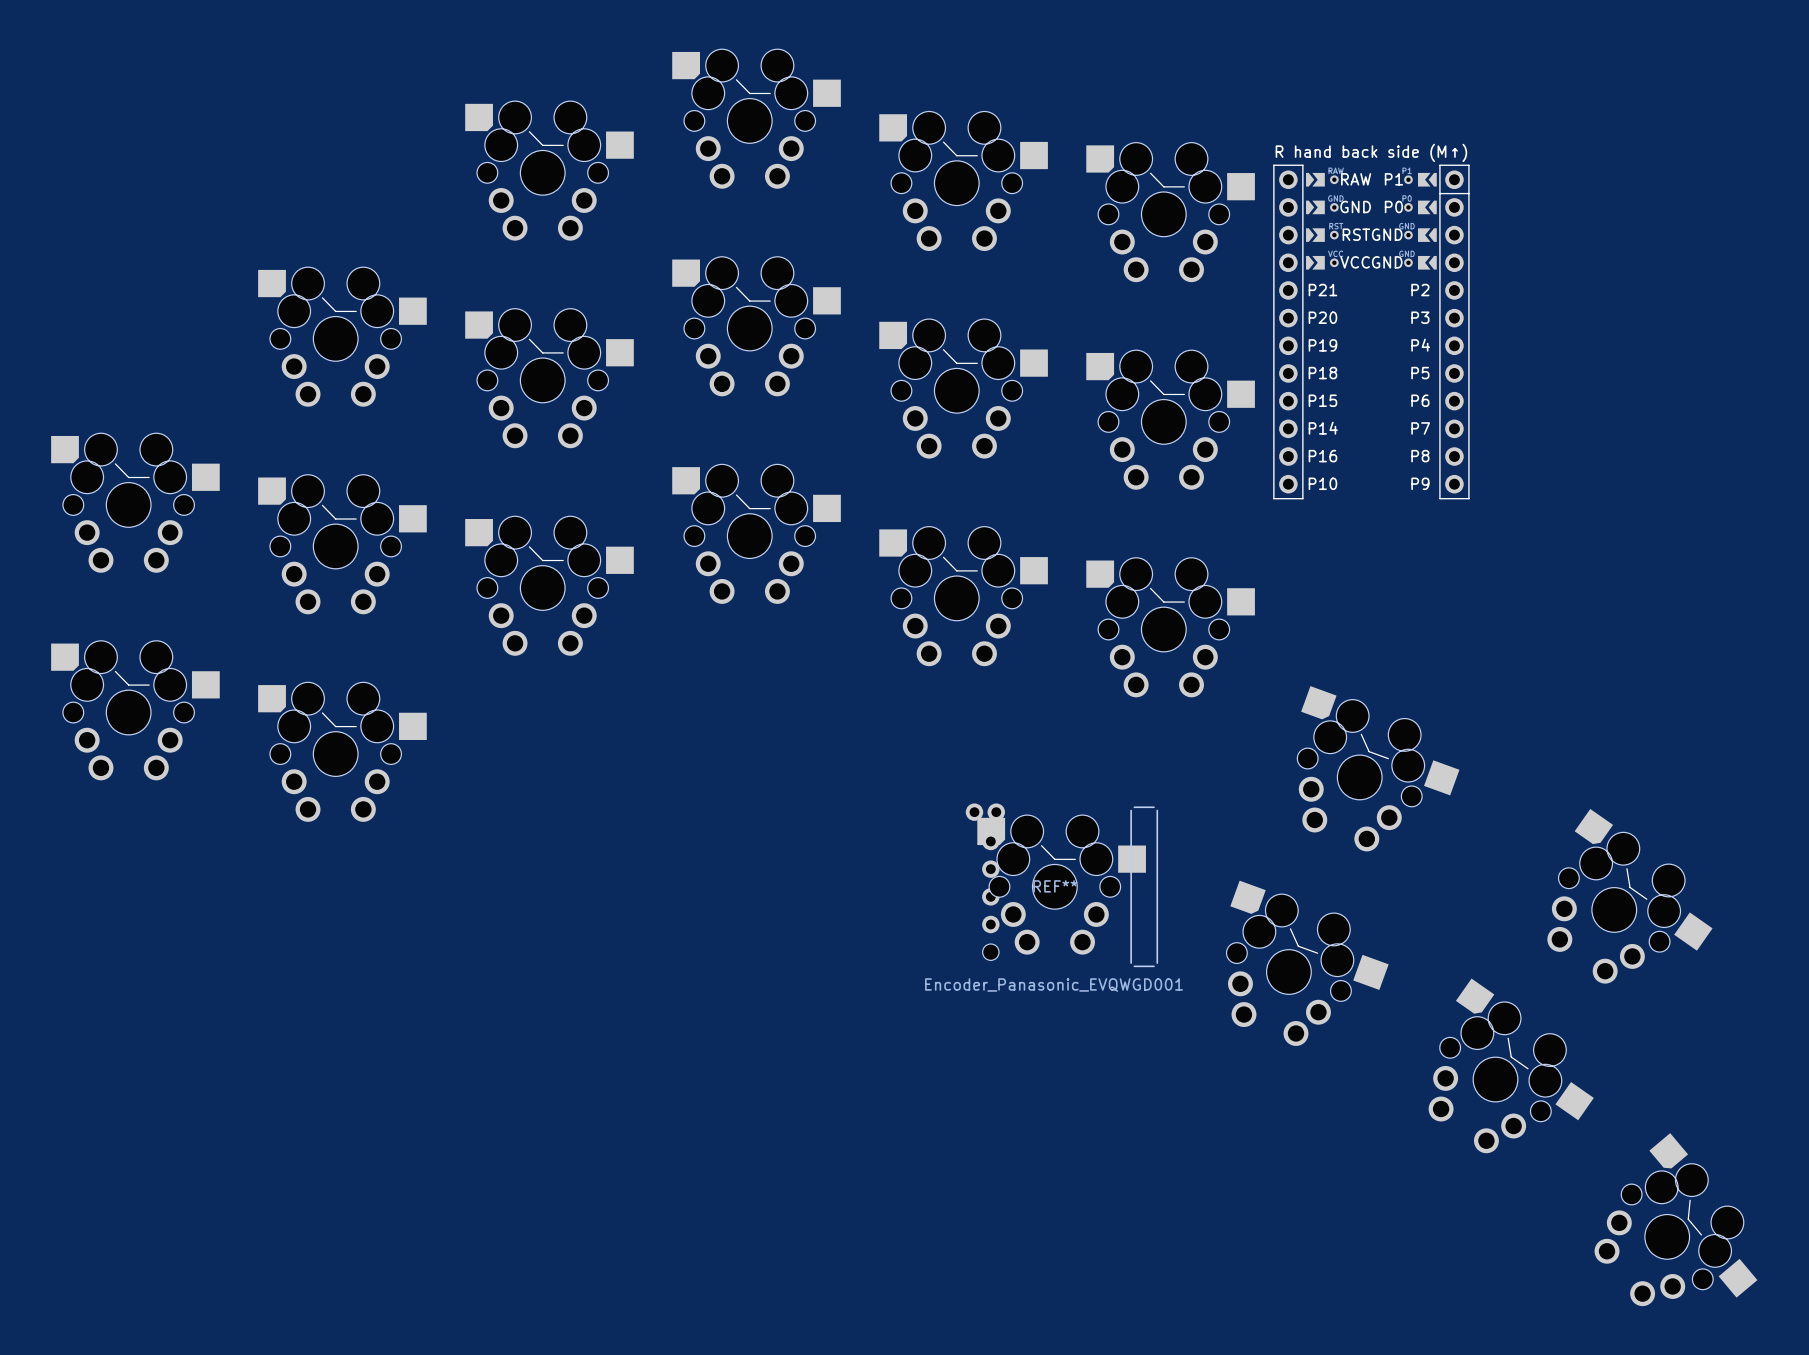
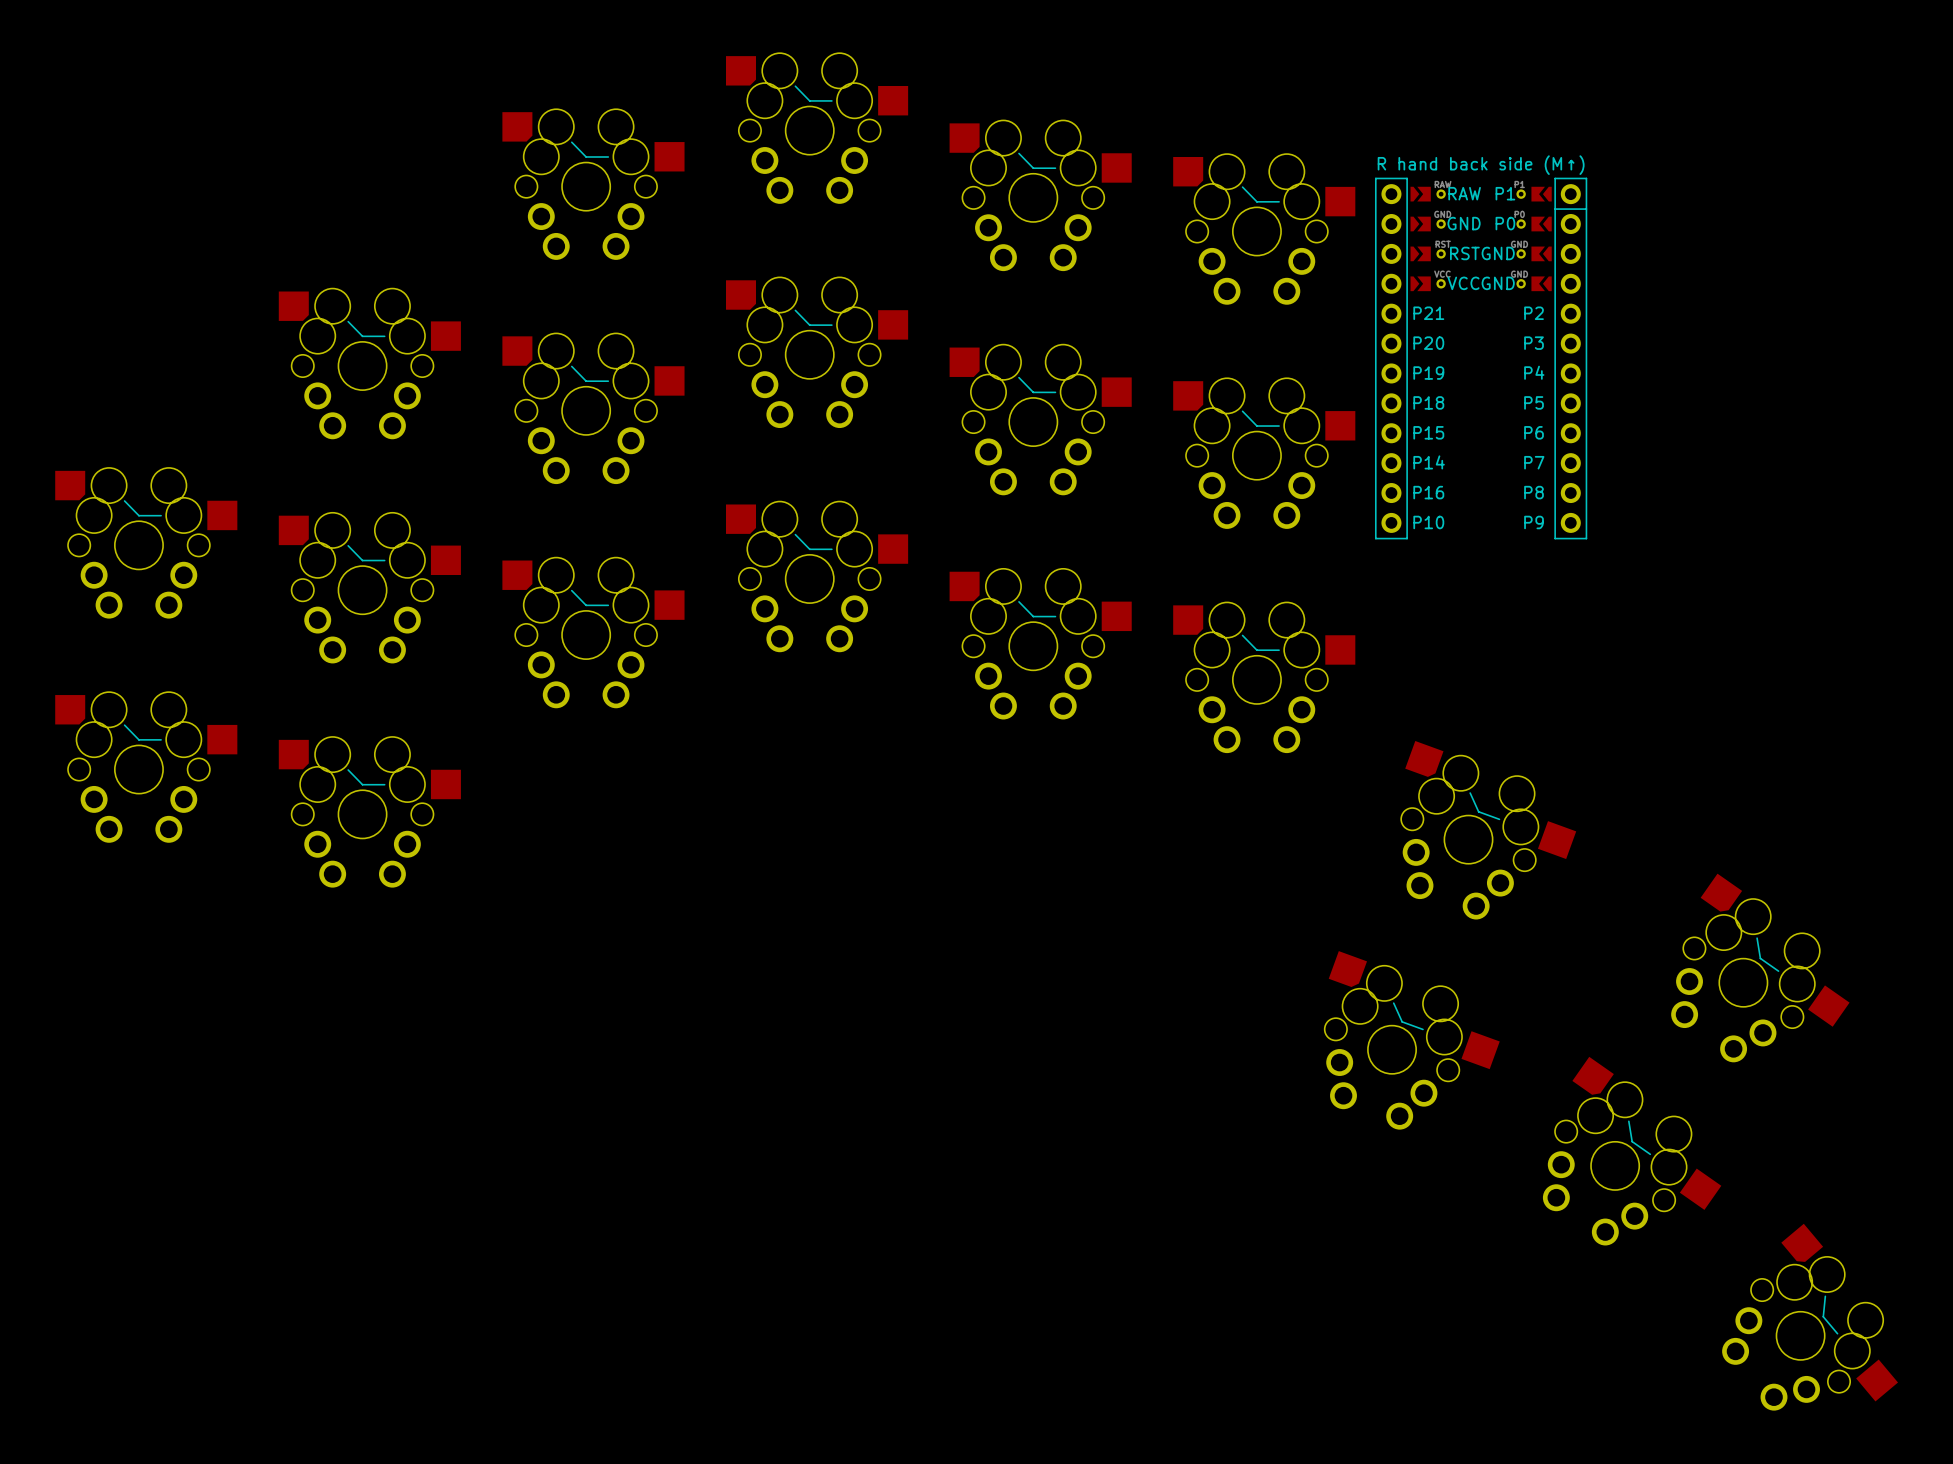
part: (1061, 884) -> none
REF**: Encoder_Panasonic_EVQWGD001 (1061, 885) -> none

